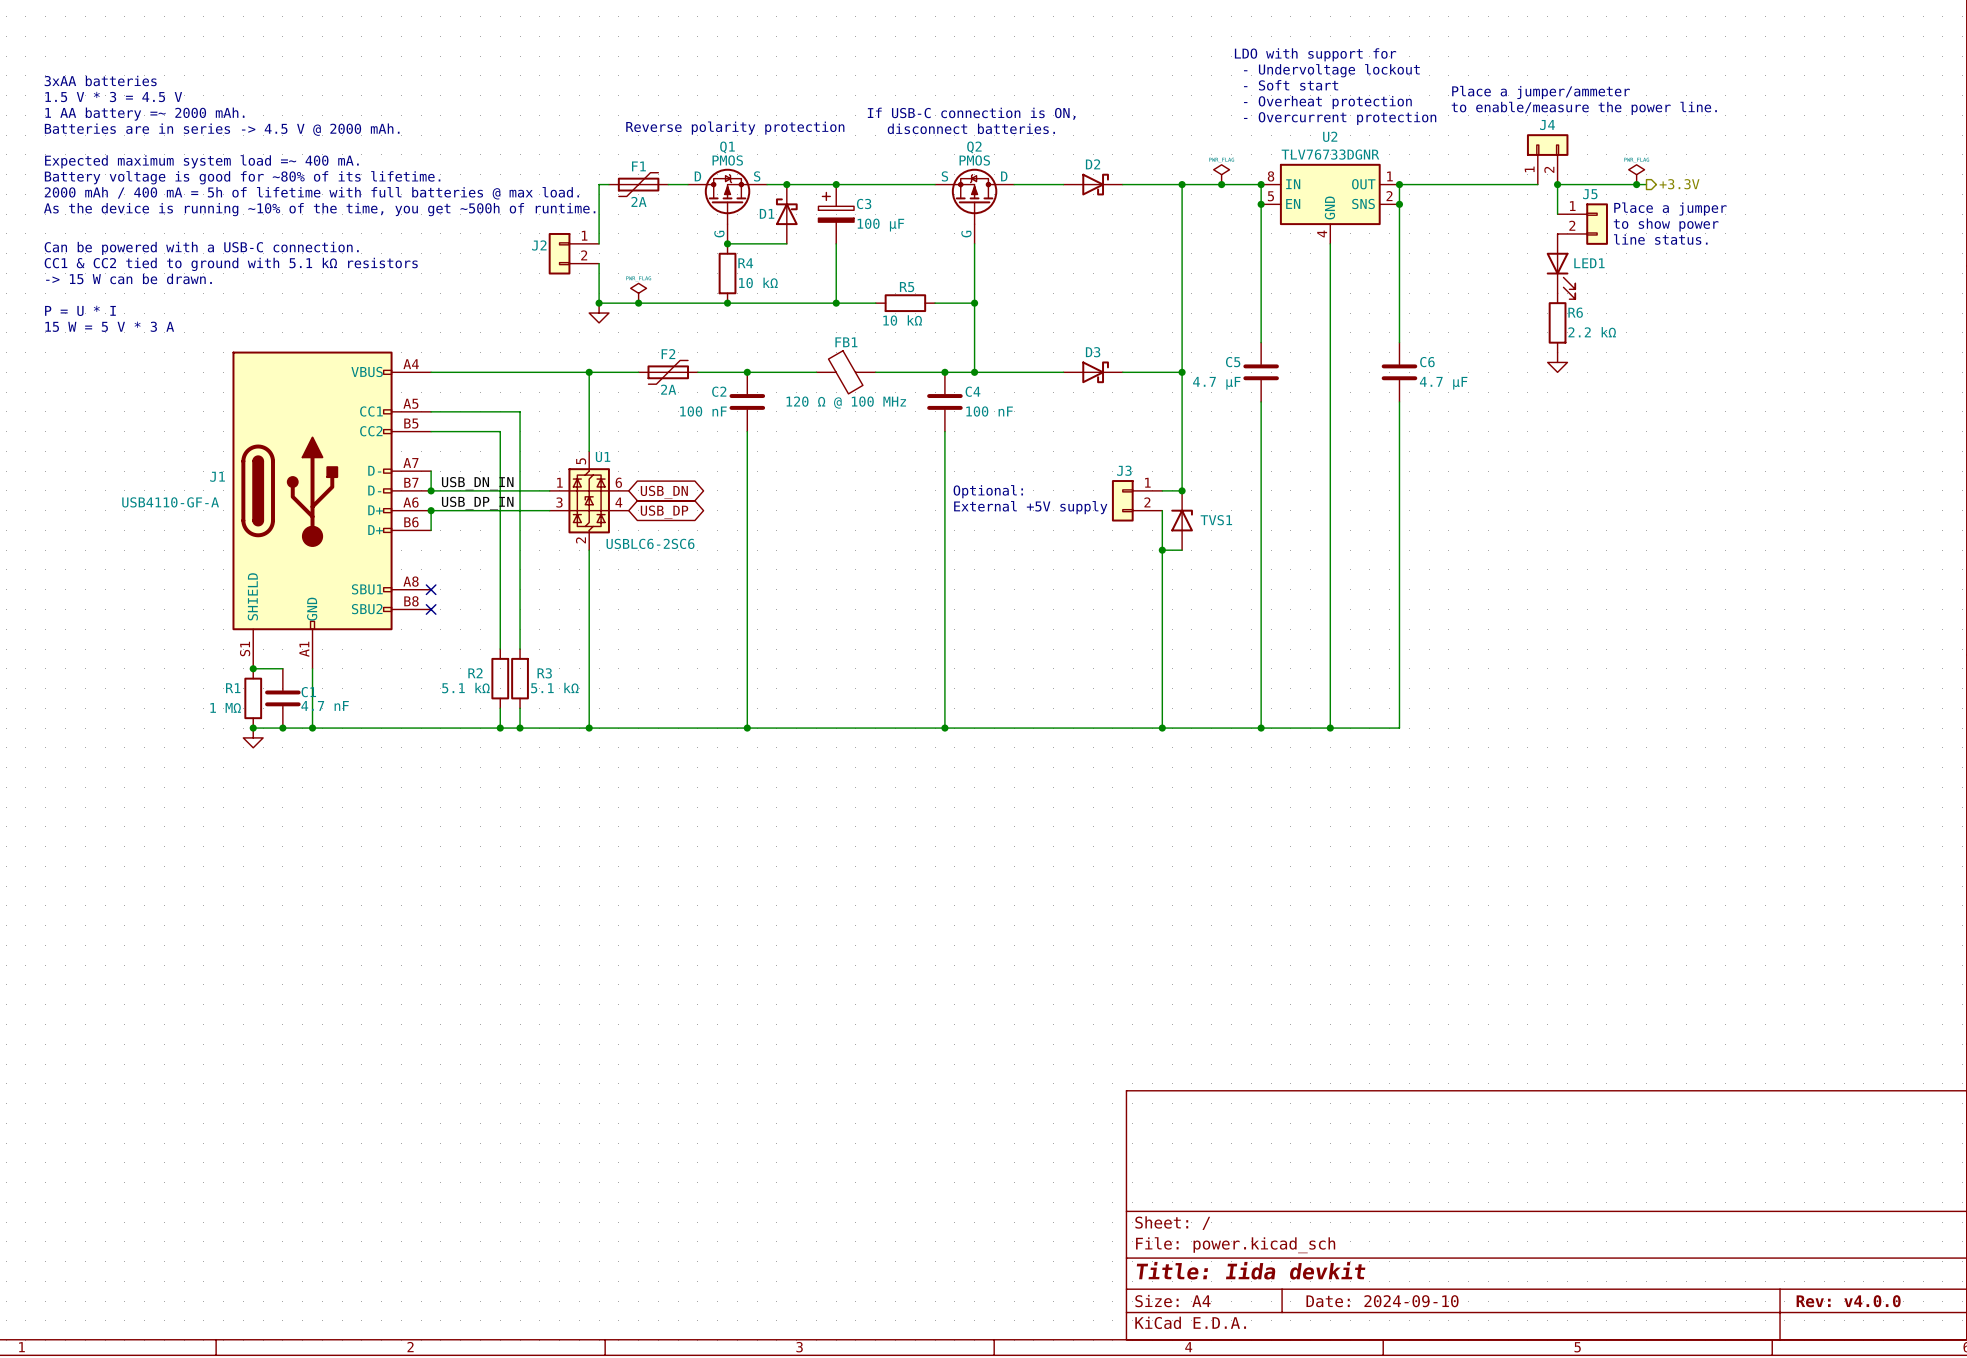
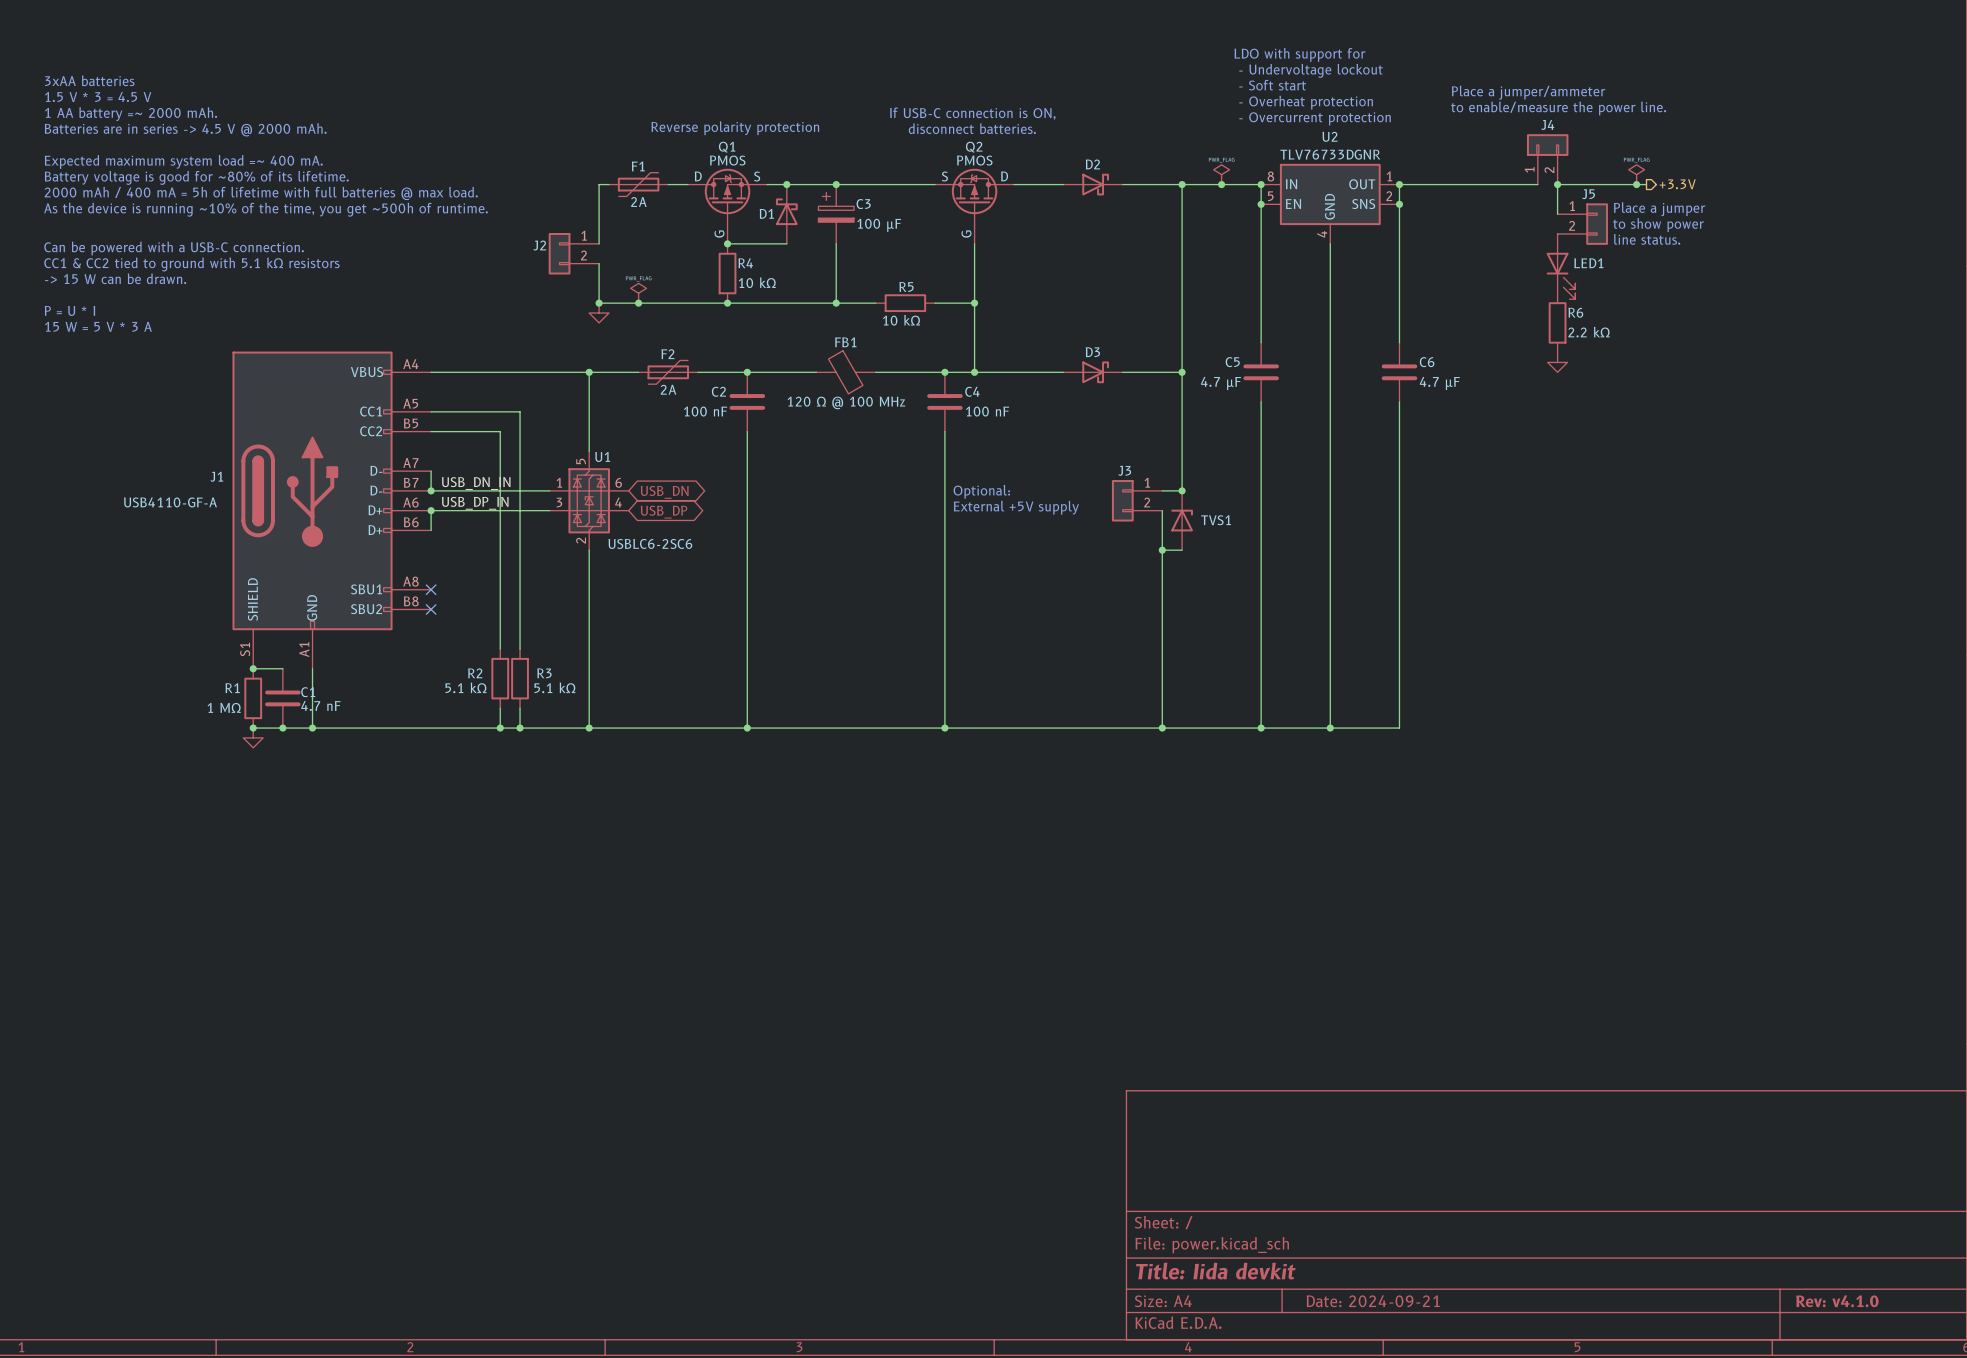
title block: Date: 2024-09-10 (1382, 1301) -> Date: 2024-09-21 (1373, 1301)
title block: Rev: v4.0.0 (1848, 1301) -> Rev: v4.1.0 (1837, 1301)

